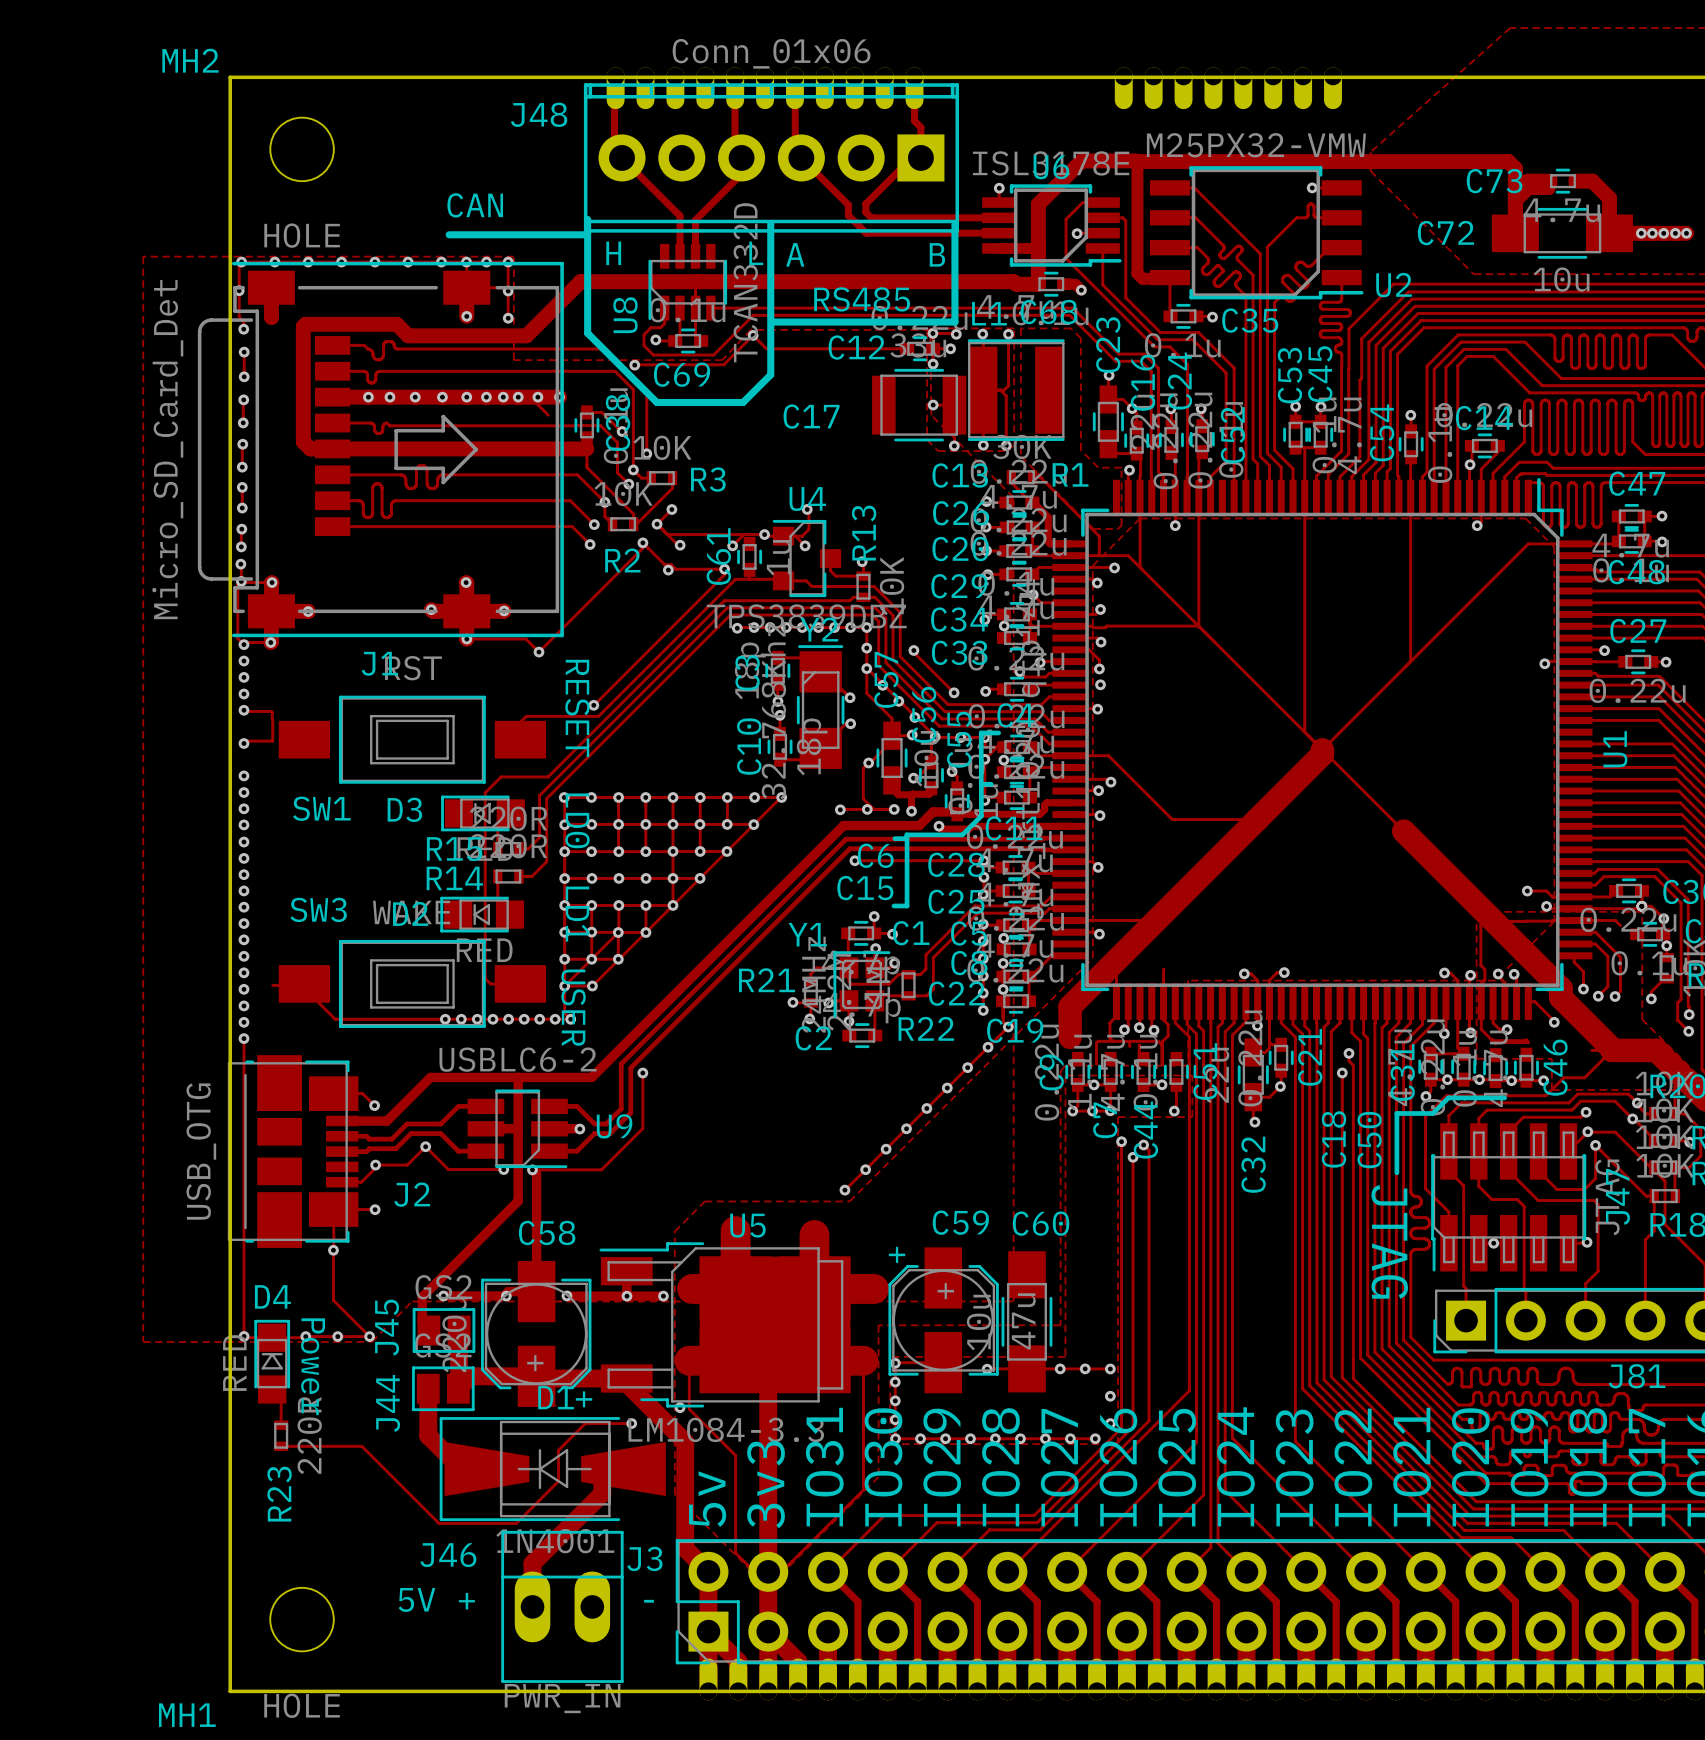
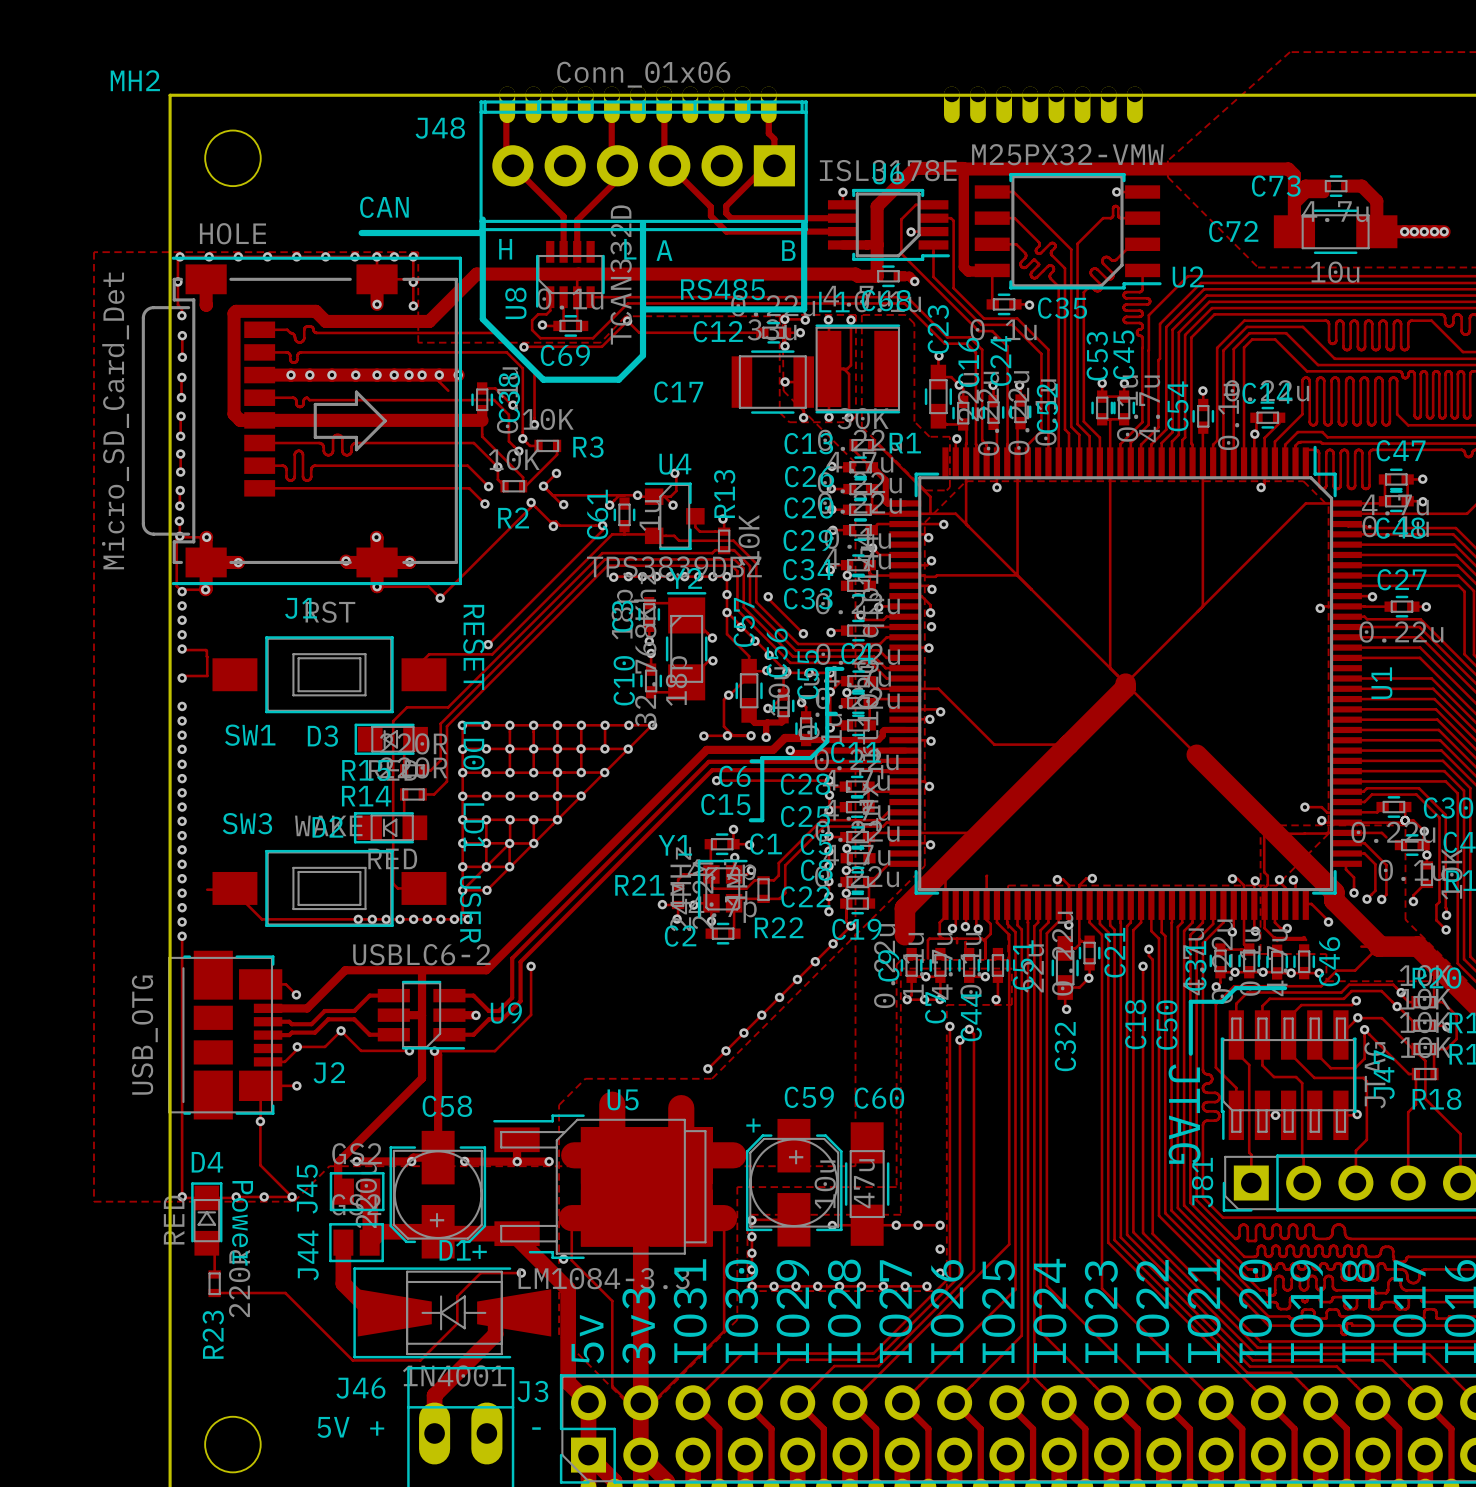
J81 name rotation: 0° (1637, 1376) -> 90° counterclockwise (1202, 1182)
J81 name position: J81 (1637, 1376) -> J81 (1202, 1182)

